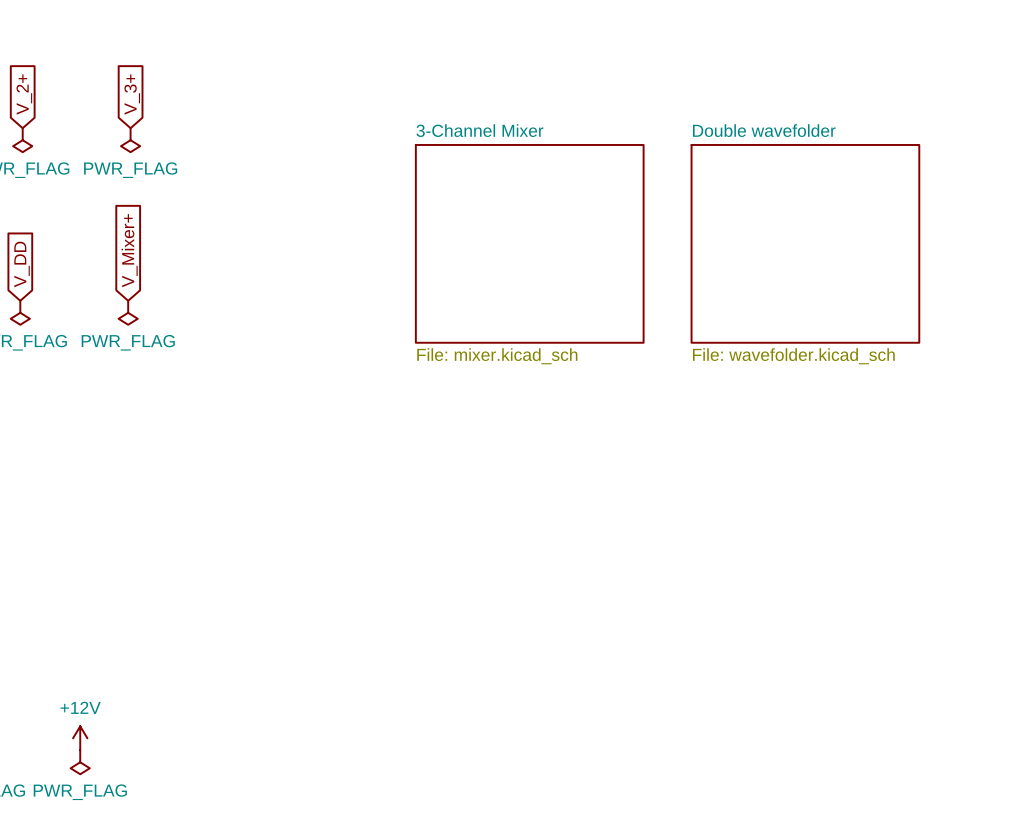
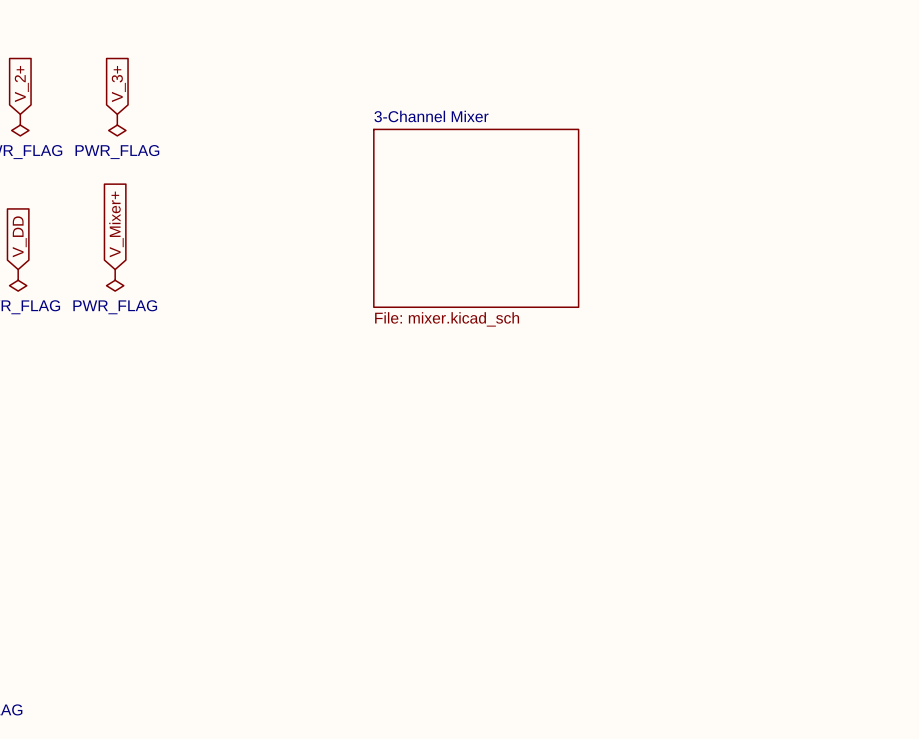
sheet Double wavefolder: File: wavefolder.kicad_sch (805, 243) -> none
power symbol: +12V (80, 738) -> none
power symbol: PWR_FLAG (80, 762) -> none

